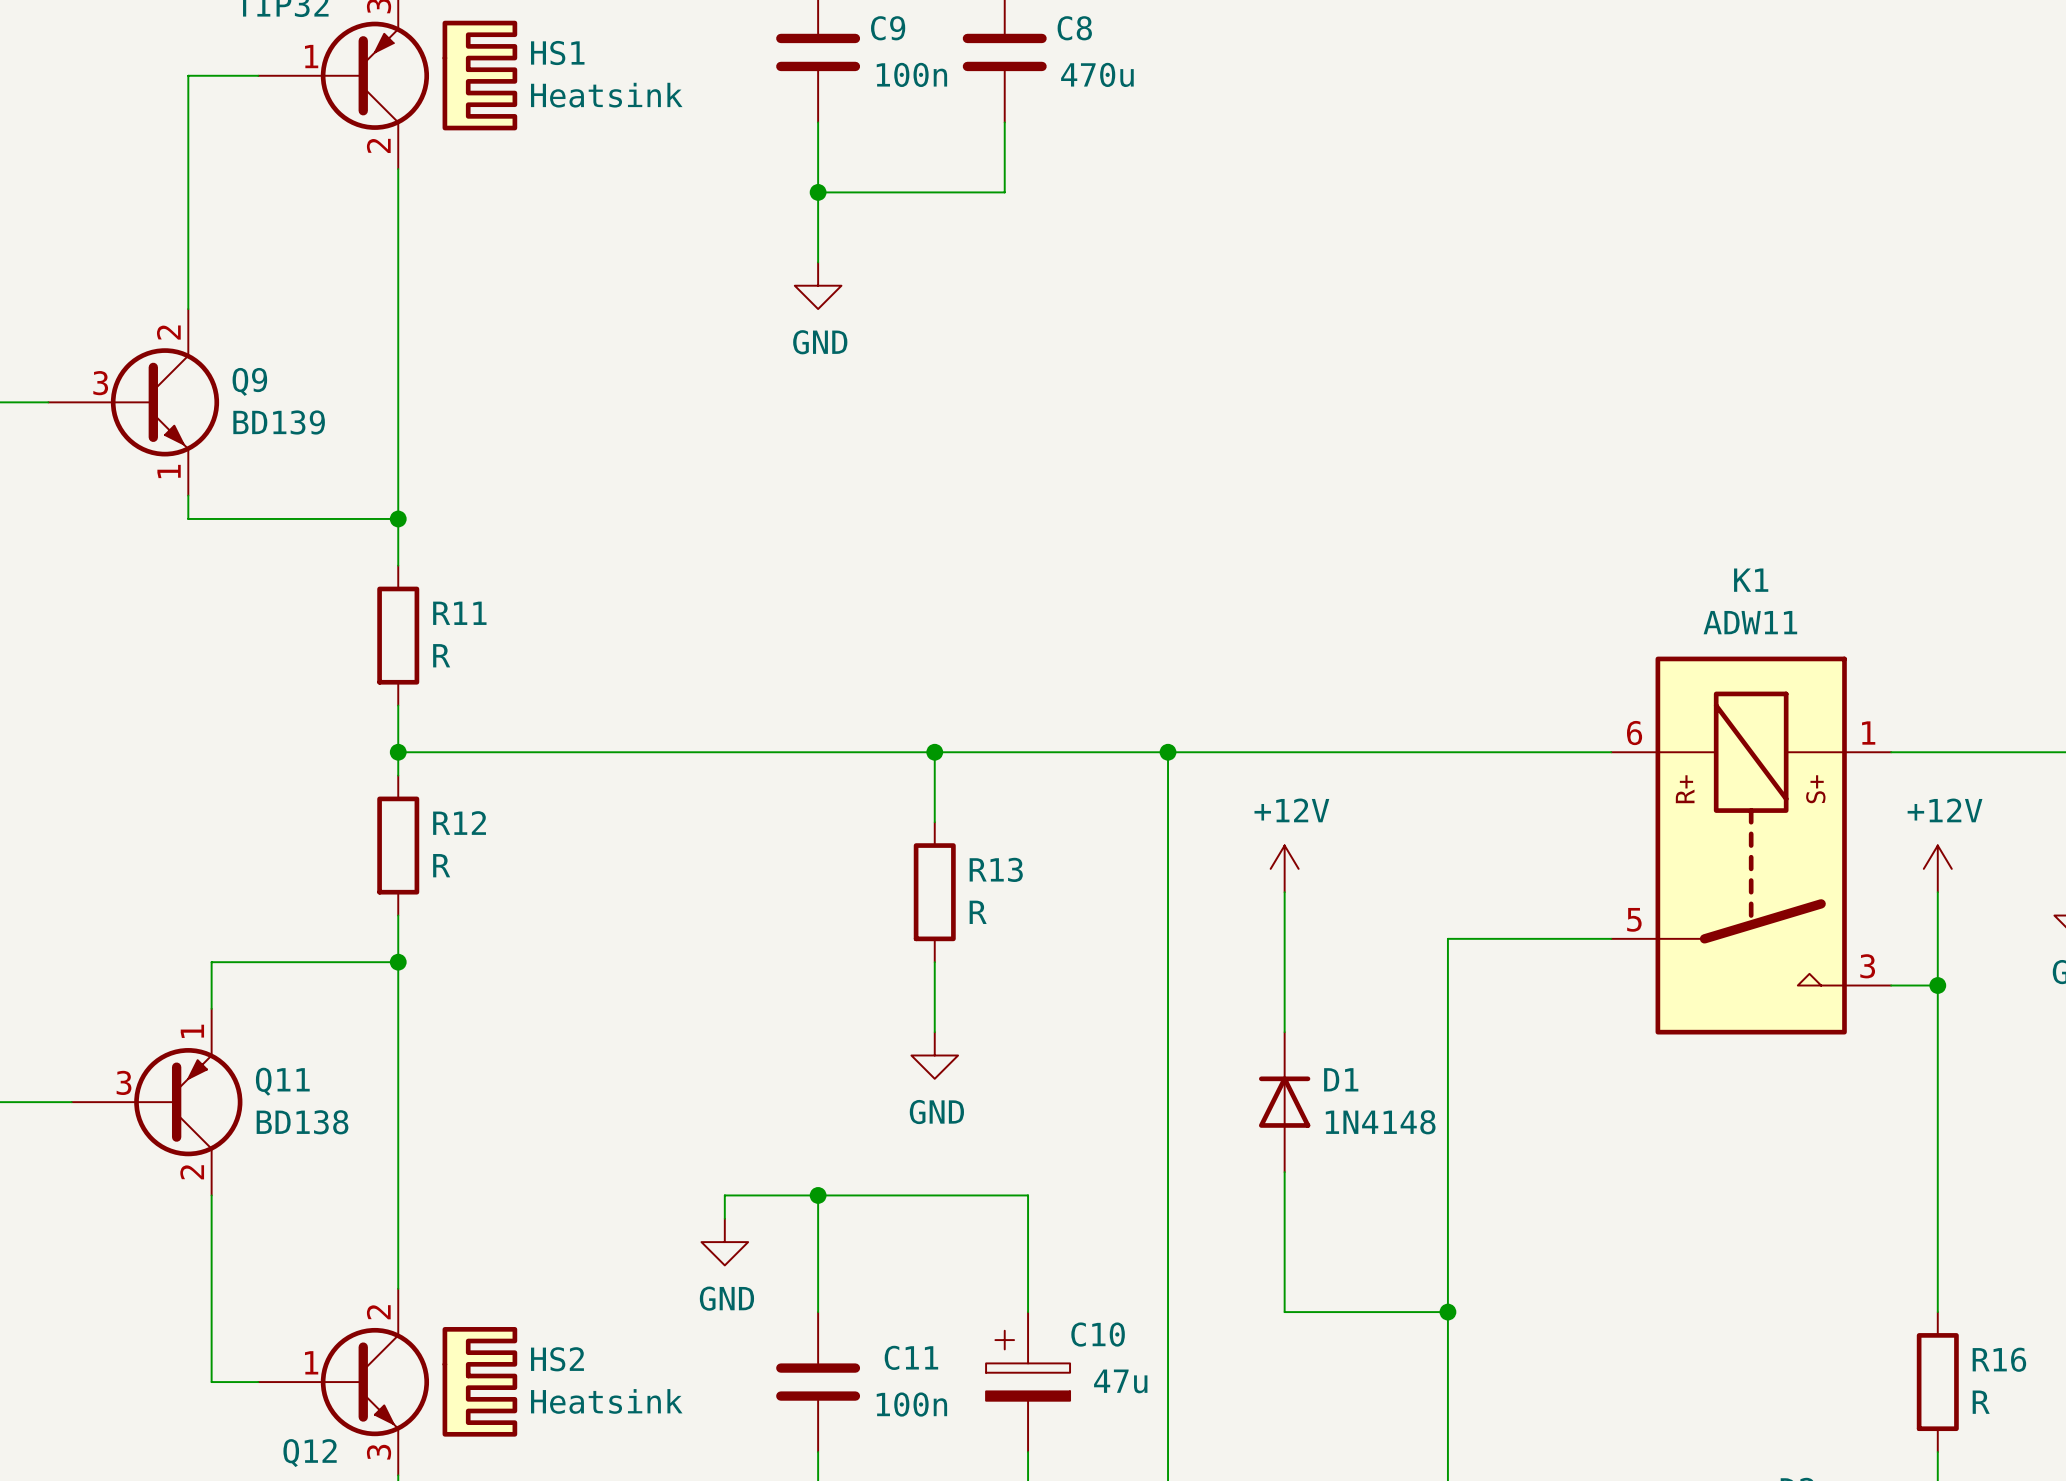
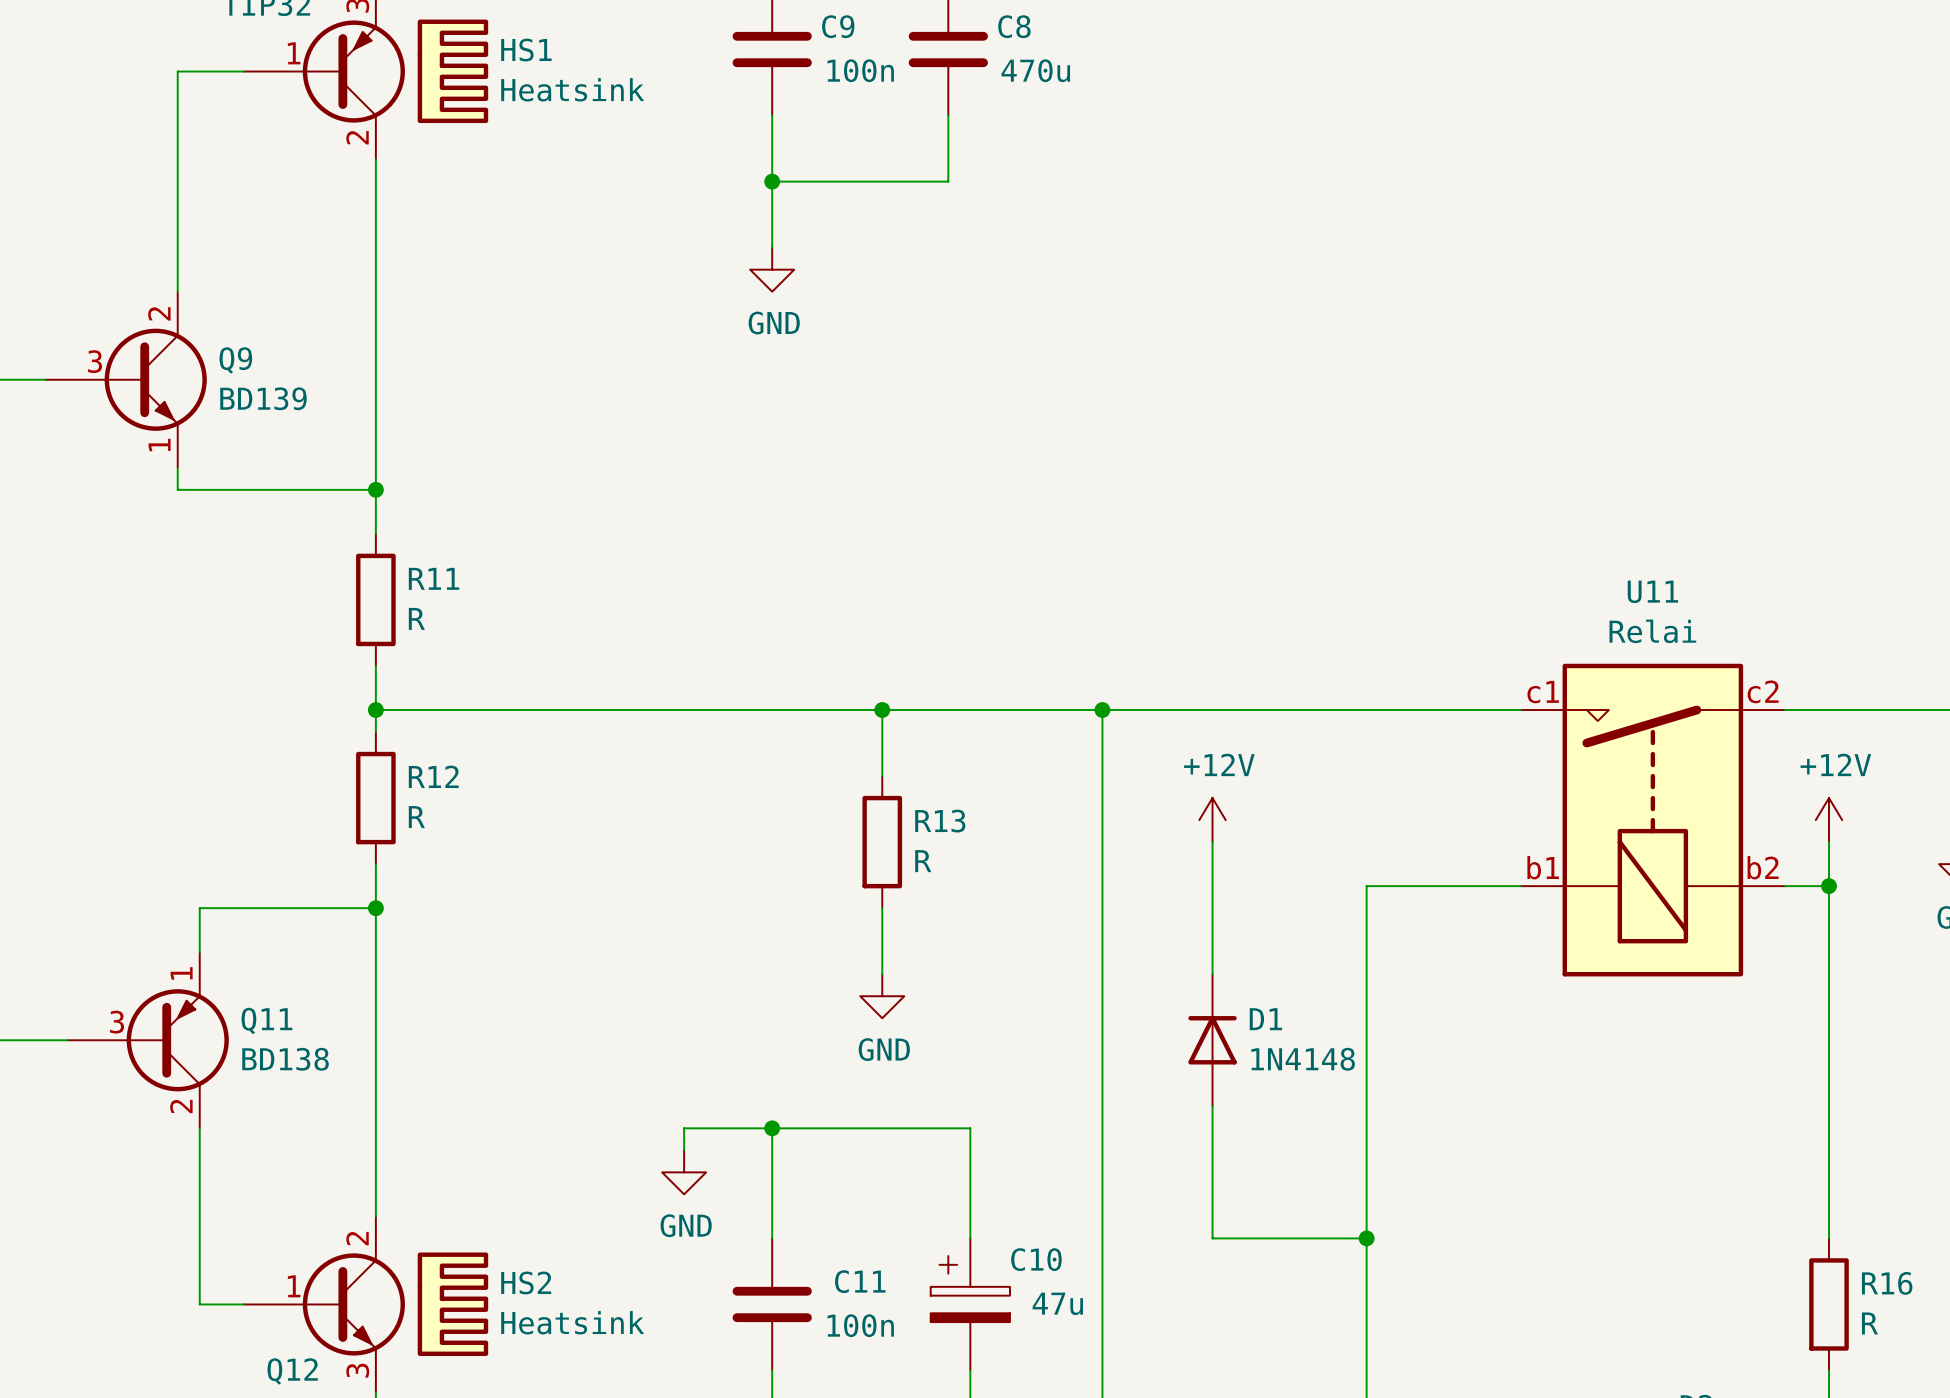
K1: ADW11 (1751, 845) -> none
U11: none -> Relai (1652, 820)
wire: (1891, 985) (1937, 985) -> (1784, 886) (1828, 886)
junction position: (1937, 985) -> (1828, 886)

